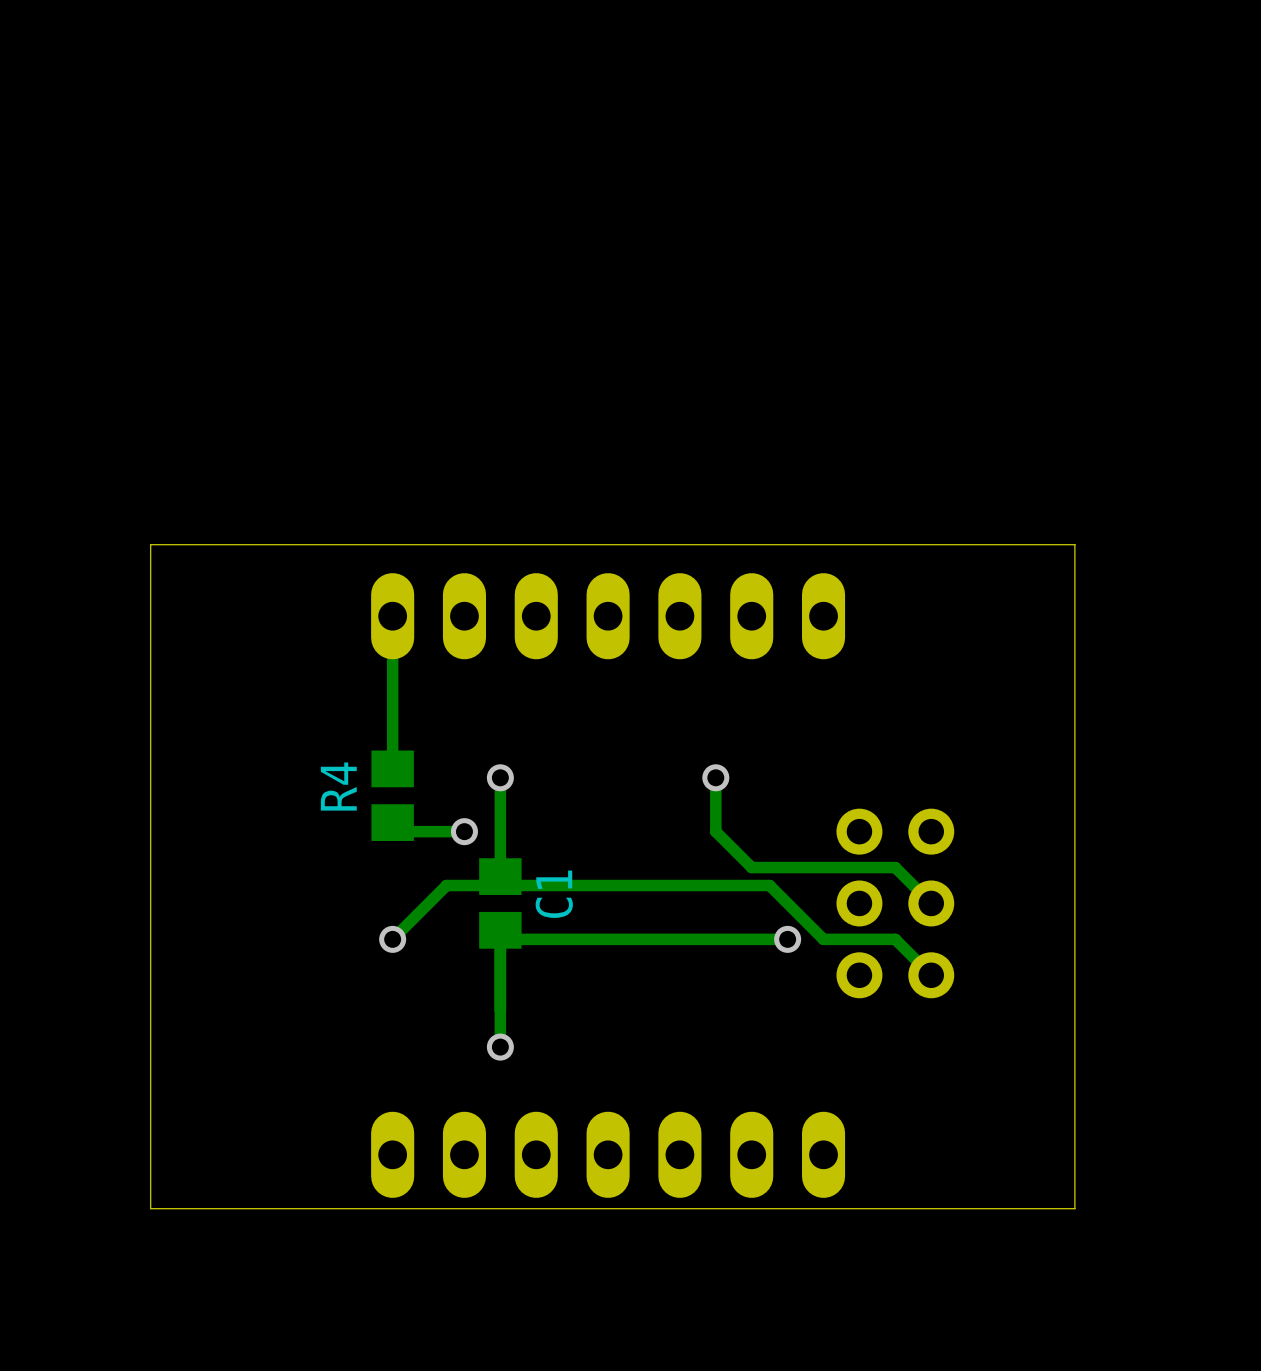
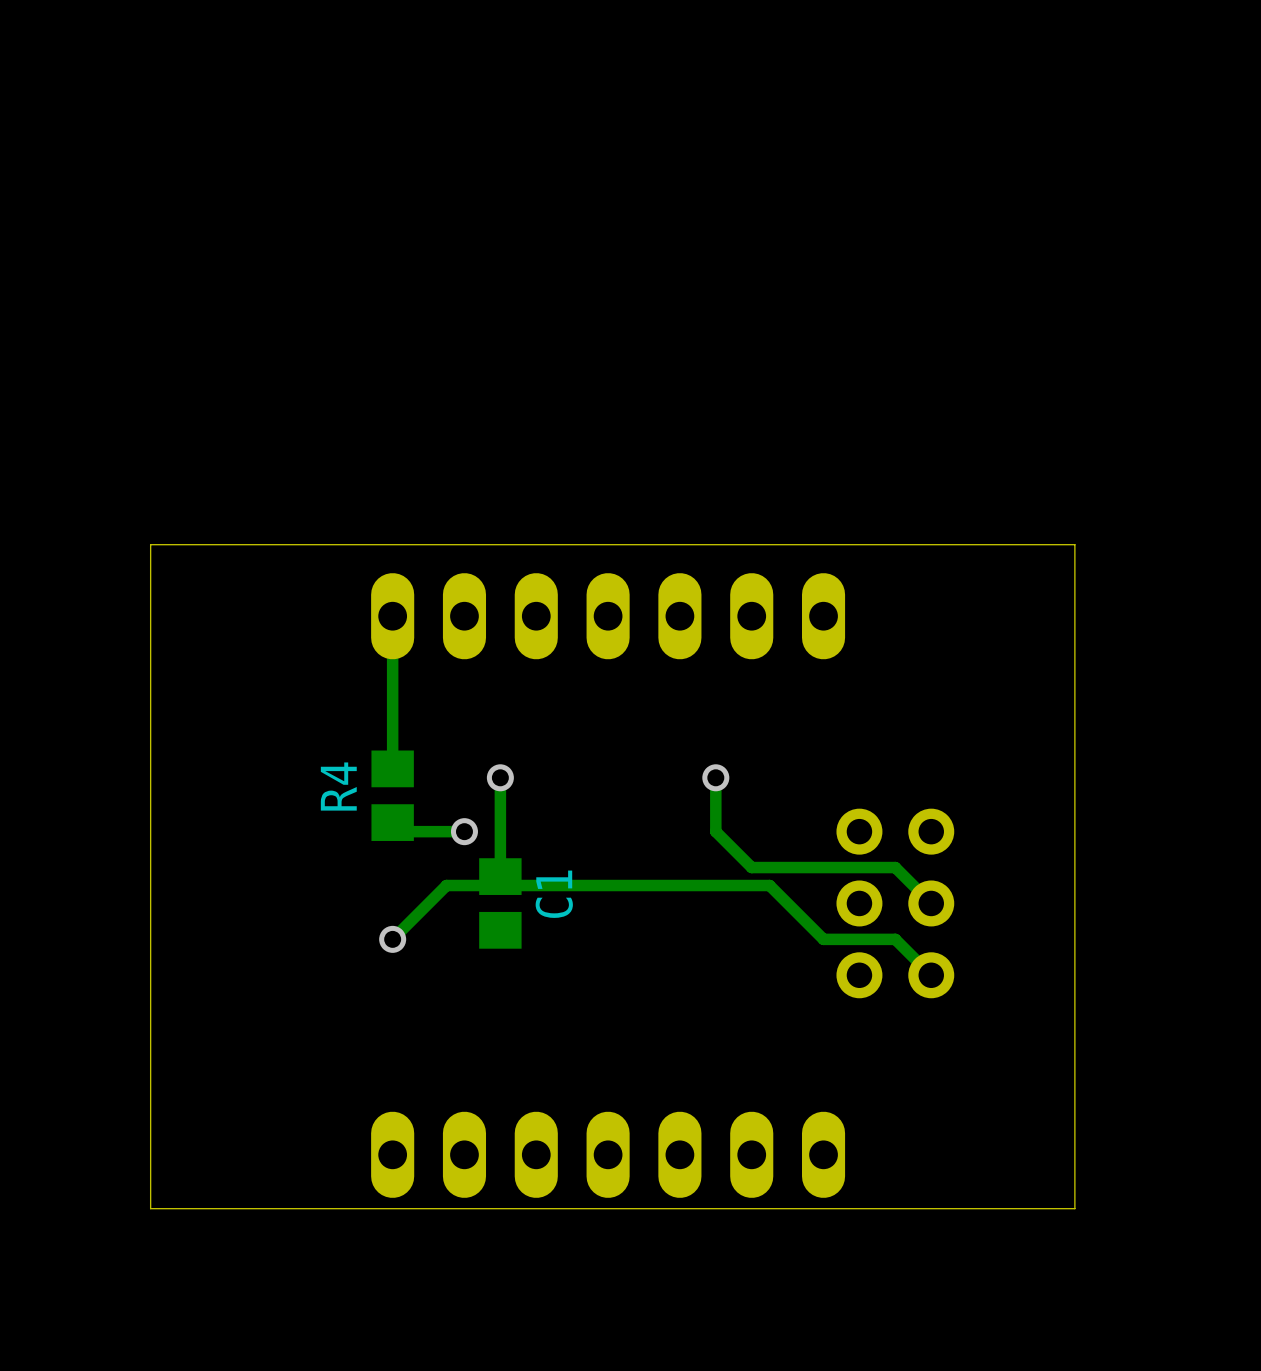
track: (500, 930) (500, 1047) -> none
track: (787, 939) (500, 939) -> none
via: (787, 939) -> none
via: (500, 1047) -> none

